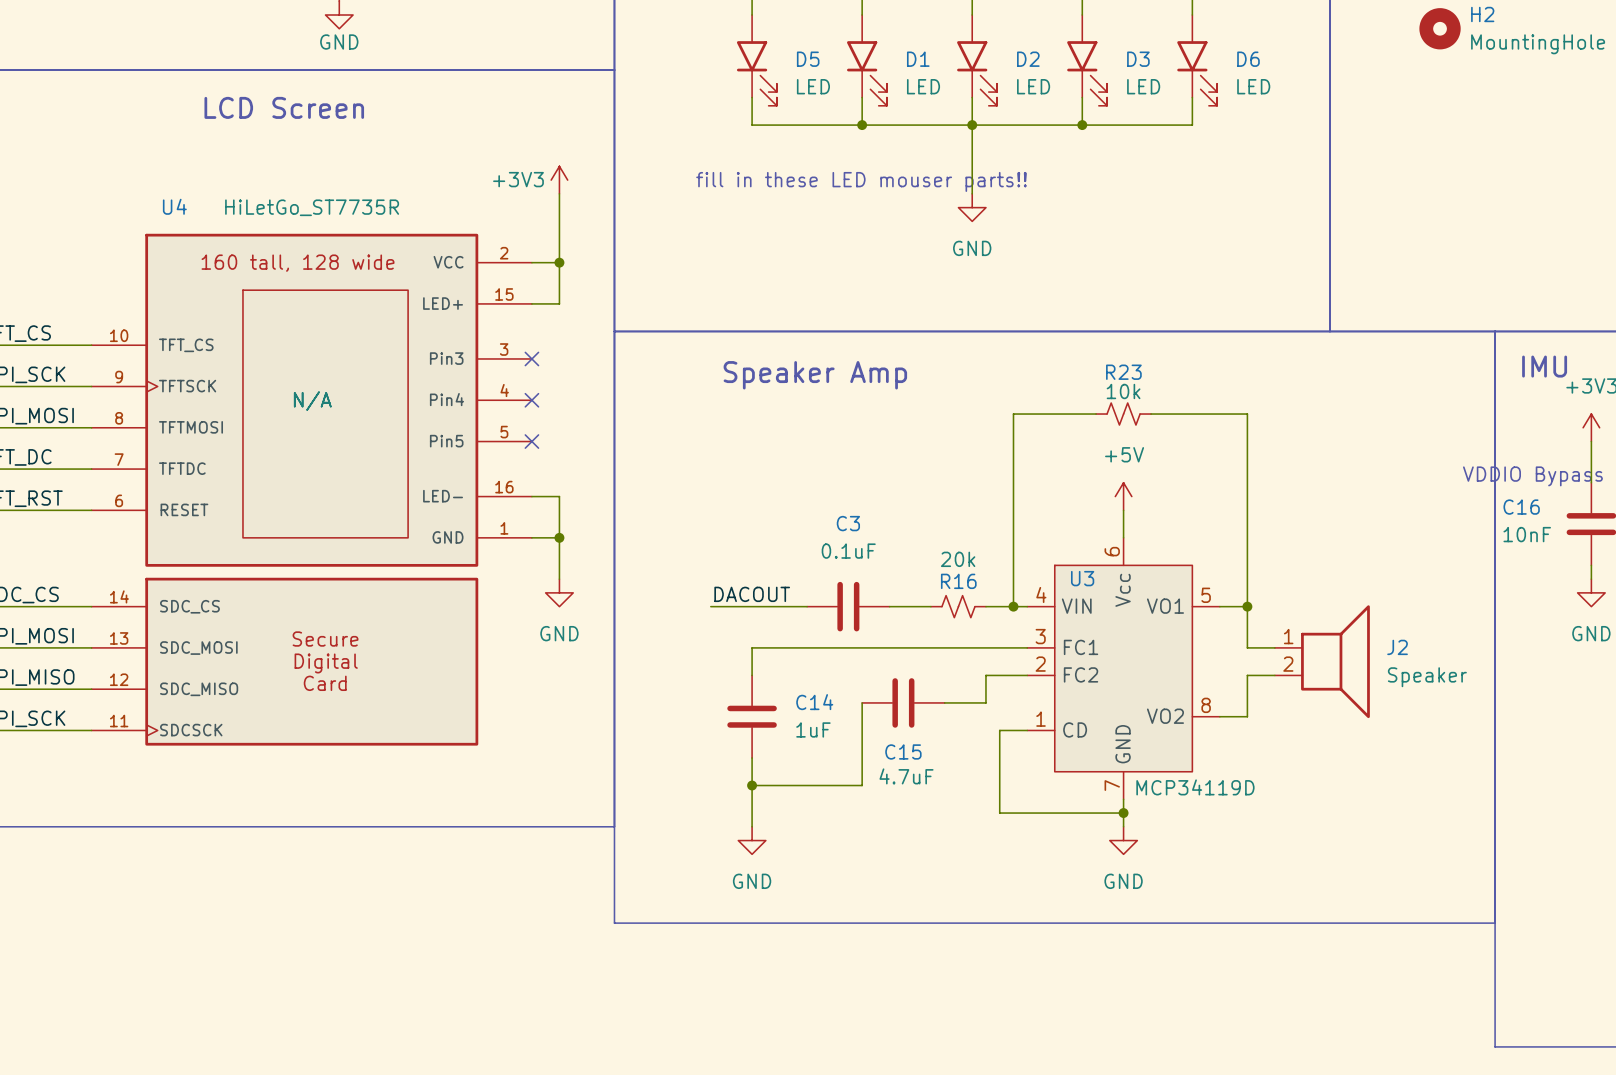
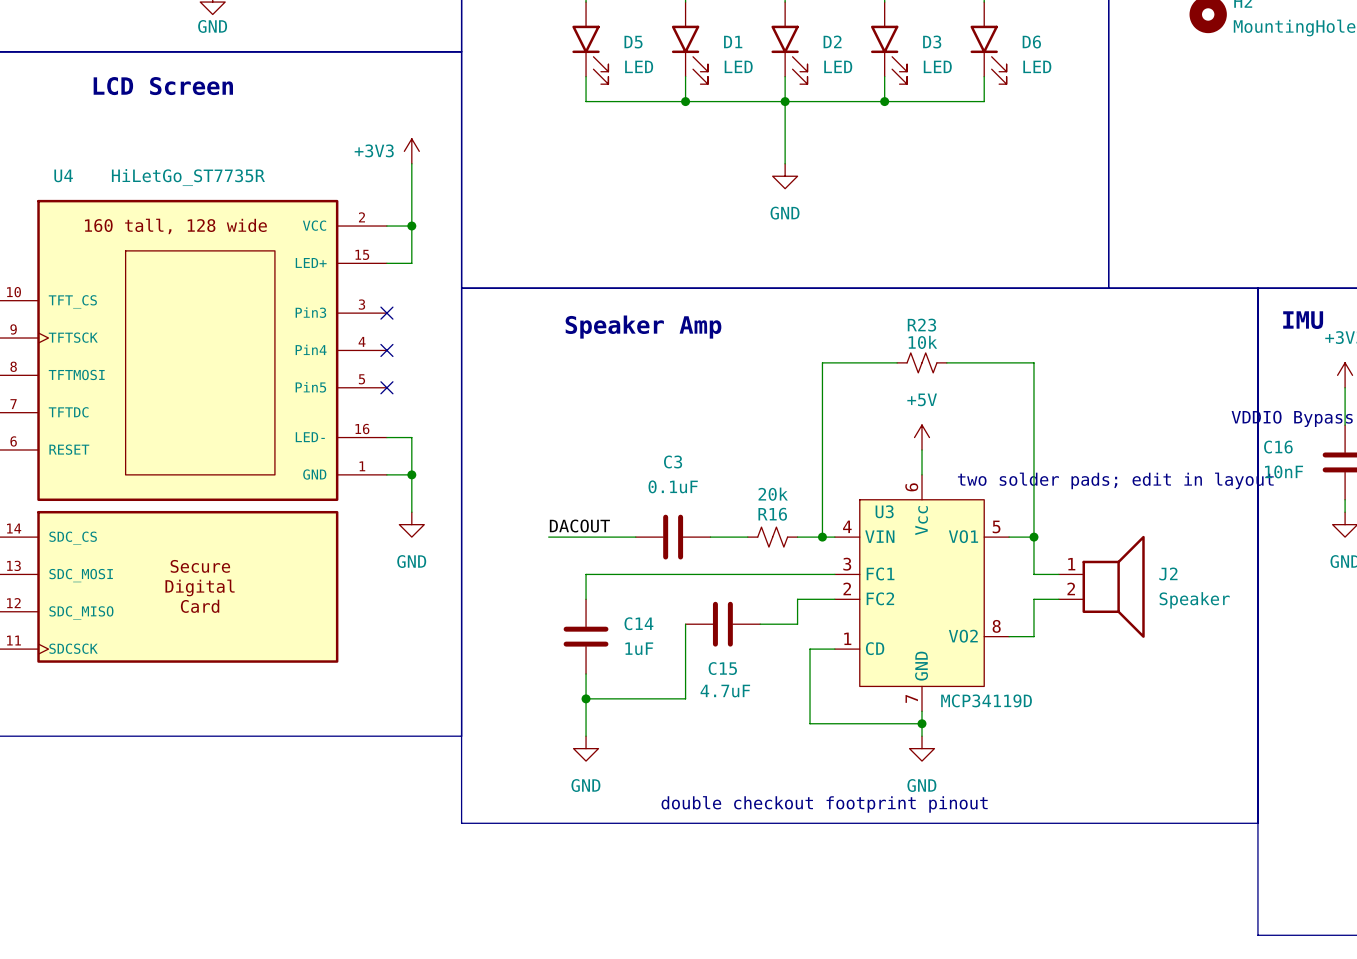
text: fill in these LED mouser parts!! (861, 181) -> none
U4 text: N/A (312, 401) -> none
U4 text: N/A (312, 401) -> none
text: none -> two solder pads; edit in layout (1115, 480)
text: none -> double checkout footprint pinout (824, 804)

